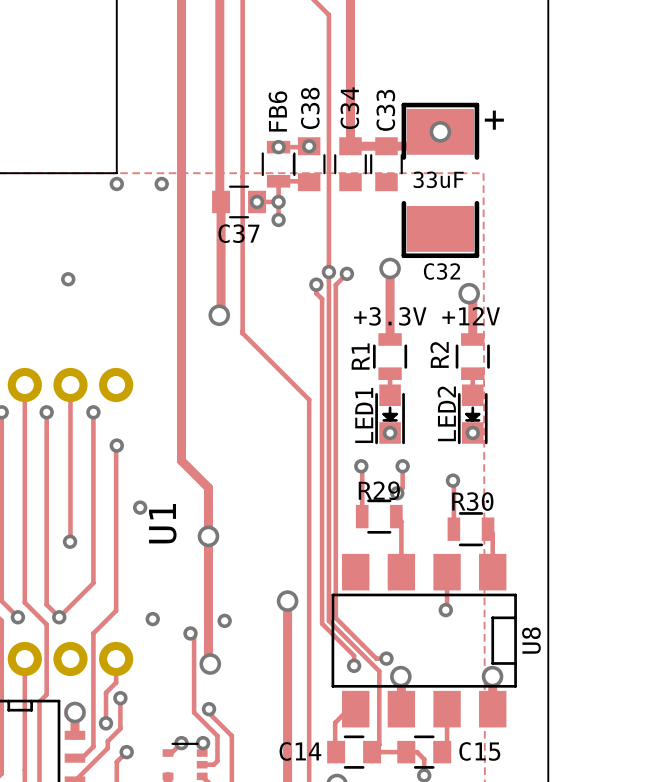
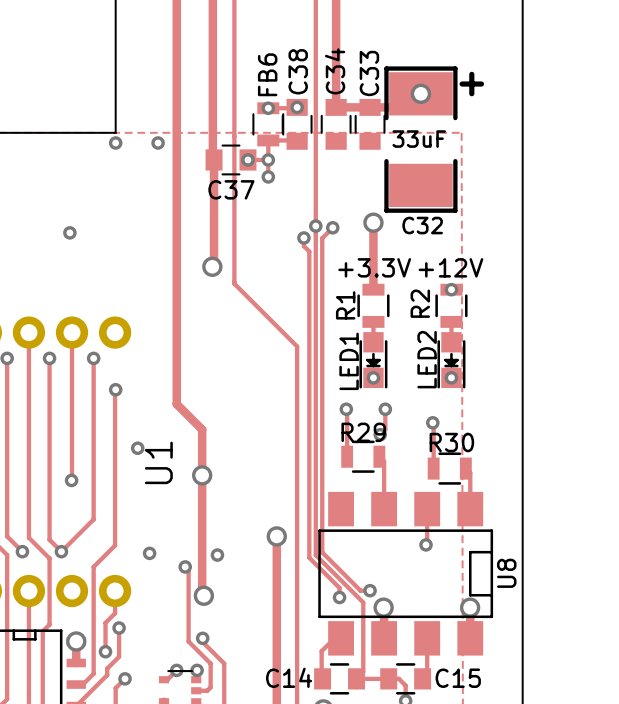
track: (469, 293) (472, 297) (472, 339) -> none
via: (469, 293) -> none
via: none -> (451, 289)

